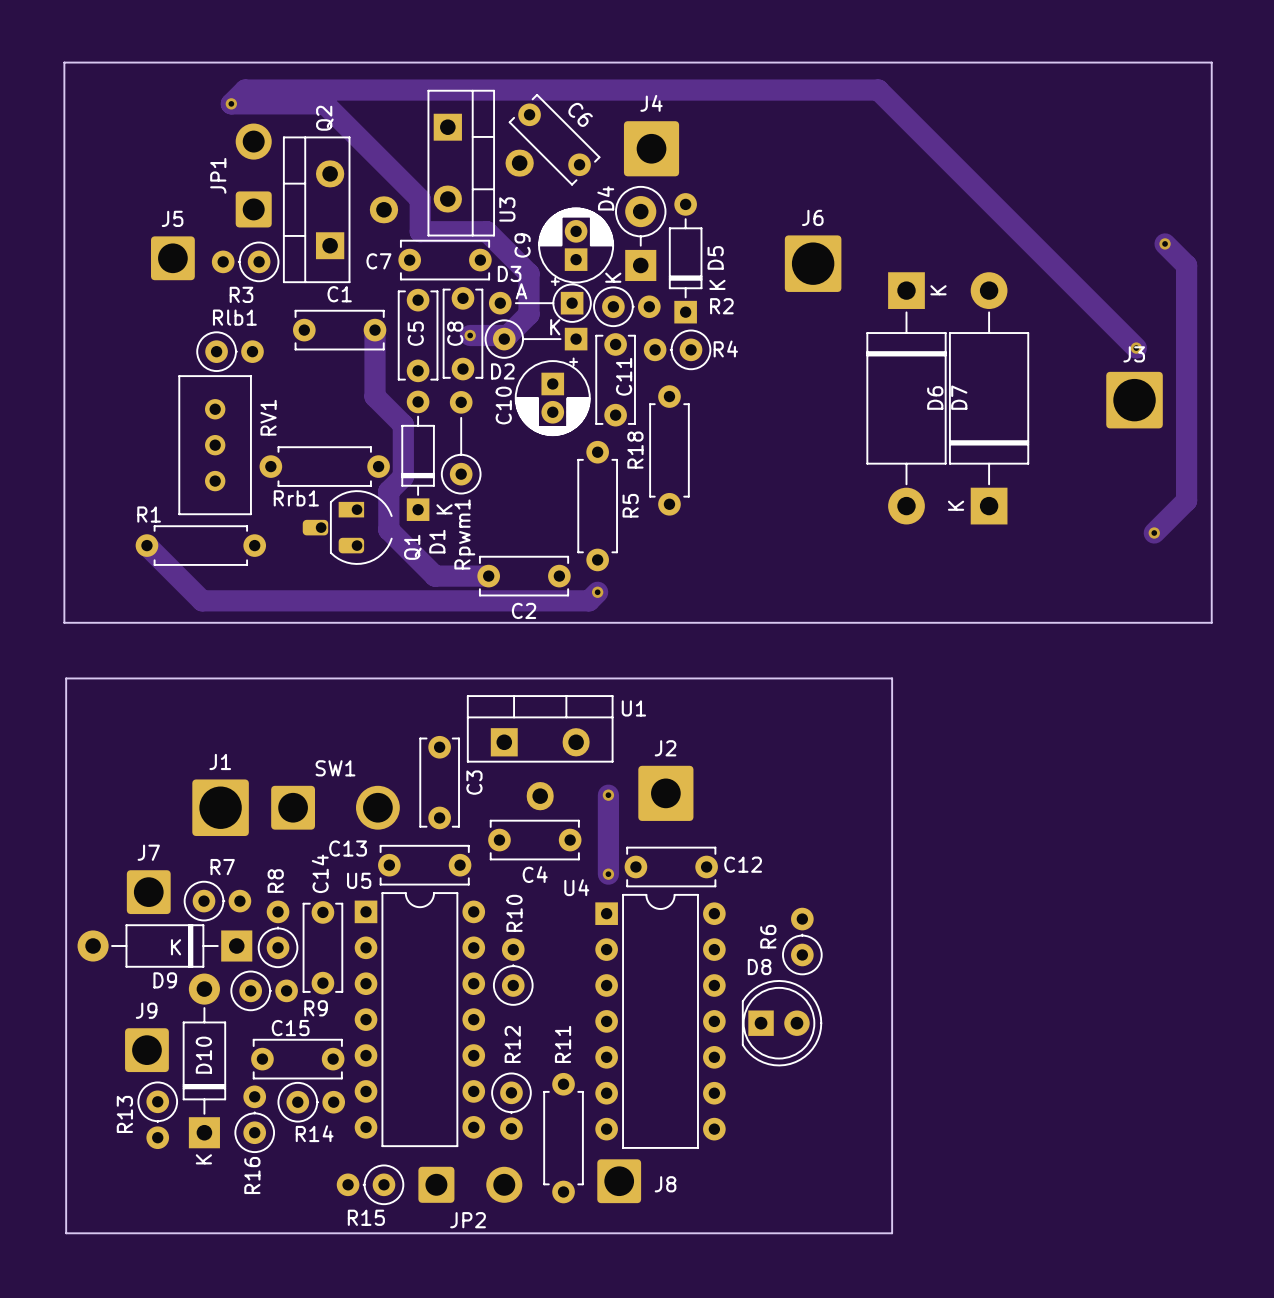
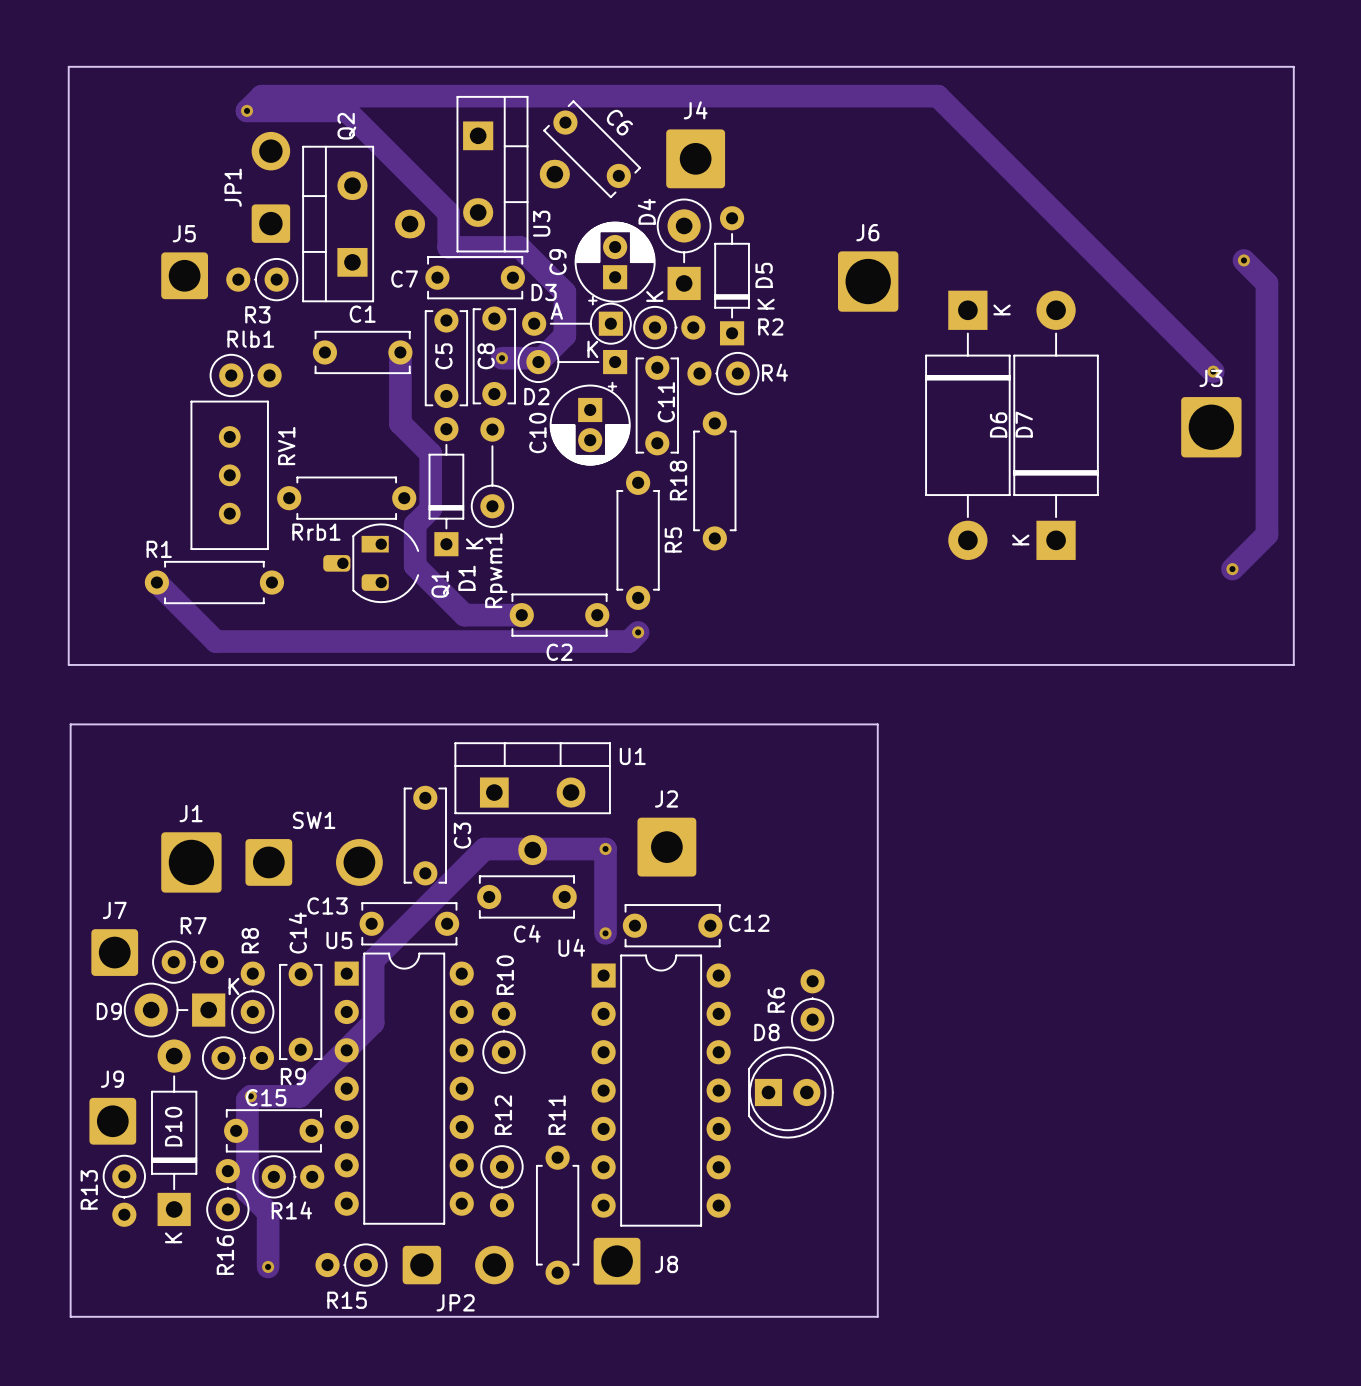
board edge: (822, 678) (892, 678) (892, 1233) (822, 1233) -> (877, 724) (877, 1316)
U1 position: (540, 752) -> (532, 803)
C3 position: (439, 782) -> (425, 835)
J2 position: (665, 793) -> (666, 847)
track: (608, 795) (608, 874) -> none
via position: (608, 795) -> (605, 849)
J1 position: (220, 807) -> (191, 862)
SW1 position: (335, 807) -> (314, 862)
C4 position: (534, 840) -> (526, 896)
C13 position: (424, 865) -> (409, 923)
C12 position: (671, 866) -> (672, 925)
track: none -> (605, 933) (605, 849) (484, 849) (373, 960) (373, 1022) (299, 1096) (250, 1096) (247, 1099) (247, 1191) (268, 1212) (268, 1266)
via position: (608, 874) -> (605, 933)
J7 position: (148, 892) -> (114, 952)
R7 position: (217, 901) -> (188, 962)
D9 footprint: [77, 924, 253, 968] -> [123, 982, 226, 1038]
R8 position: (278, 934) -> (252, 997)
R6 position: (802, 941) -> (812, 1005)
C14 position: (322, 947) -> (300, 1011)
R10 position: (513, 971) -> (503, 1037)
D9 name position: D9 (165, 980) -> D9 (109, 1011)
R9 position: (264, 990) -> (237, 1057)
U5 position: (419, 1019) -> (404, 1088)
U4 position: (660, 1021) -> (661, 1090)
D8 position: (782, 1023) -> (790, 1092)
via: none -> (250, 1096)
J9 position: (146, 1050) -> (112, 1121)
C15 position: (297, 1059) -> (273, 1130)
D10 position: (204, 1060) -> (174, 1132)
R14 position: (311, 1102) -> (288, 1176)
R12 position: (511, 1106) -> (502, 1181)
R13 position: (157, 1115) -> (124, 1190)
R16 position: (254, 1119) -> (227, 1195)
R11 position: (563, 1138) -> (557, 1215)
J8 position: (619, 1181) -> (617, 1261)
R15 position: (370, 1184) -> (351, 1265)
JP2 position: (470, 1184) -> (458, 1265)
via: none -> (268, 1266)

